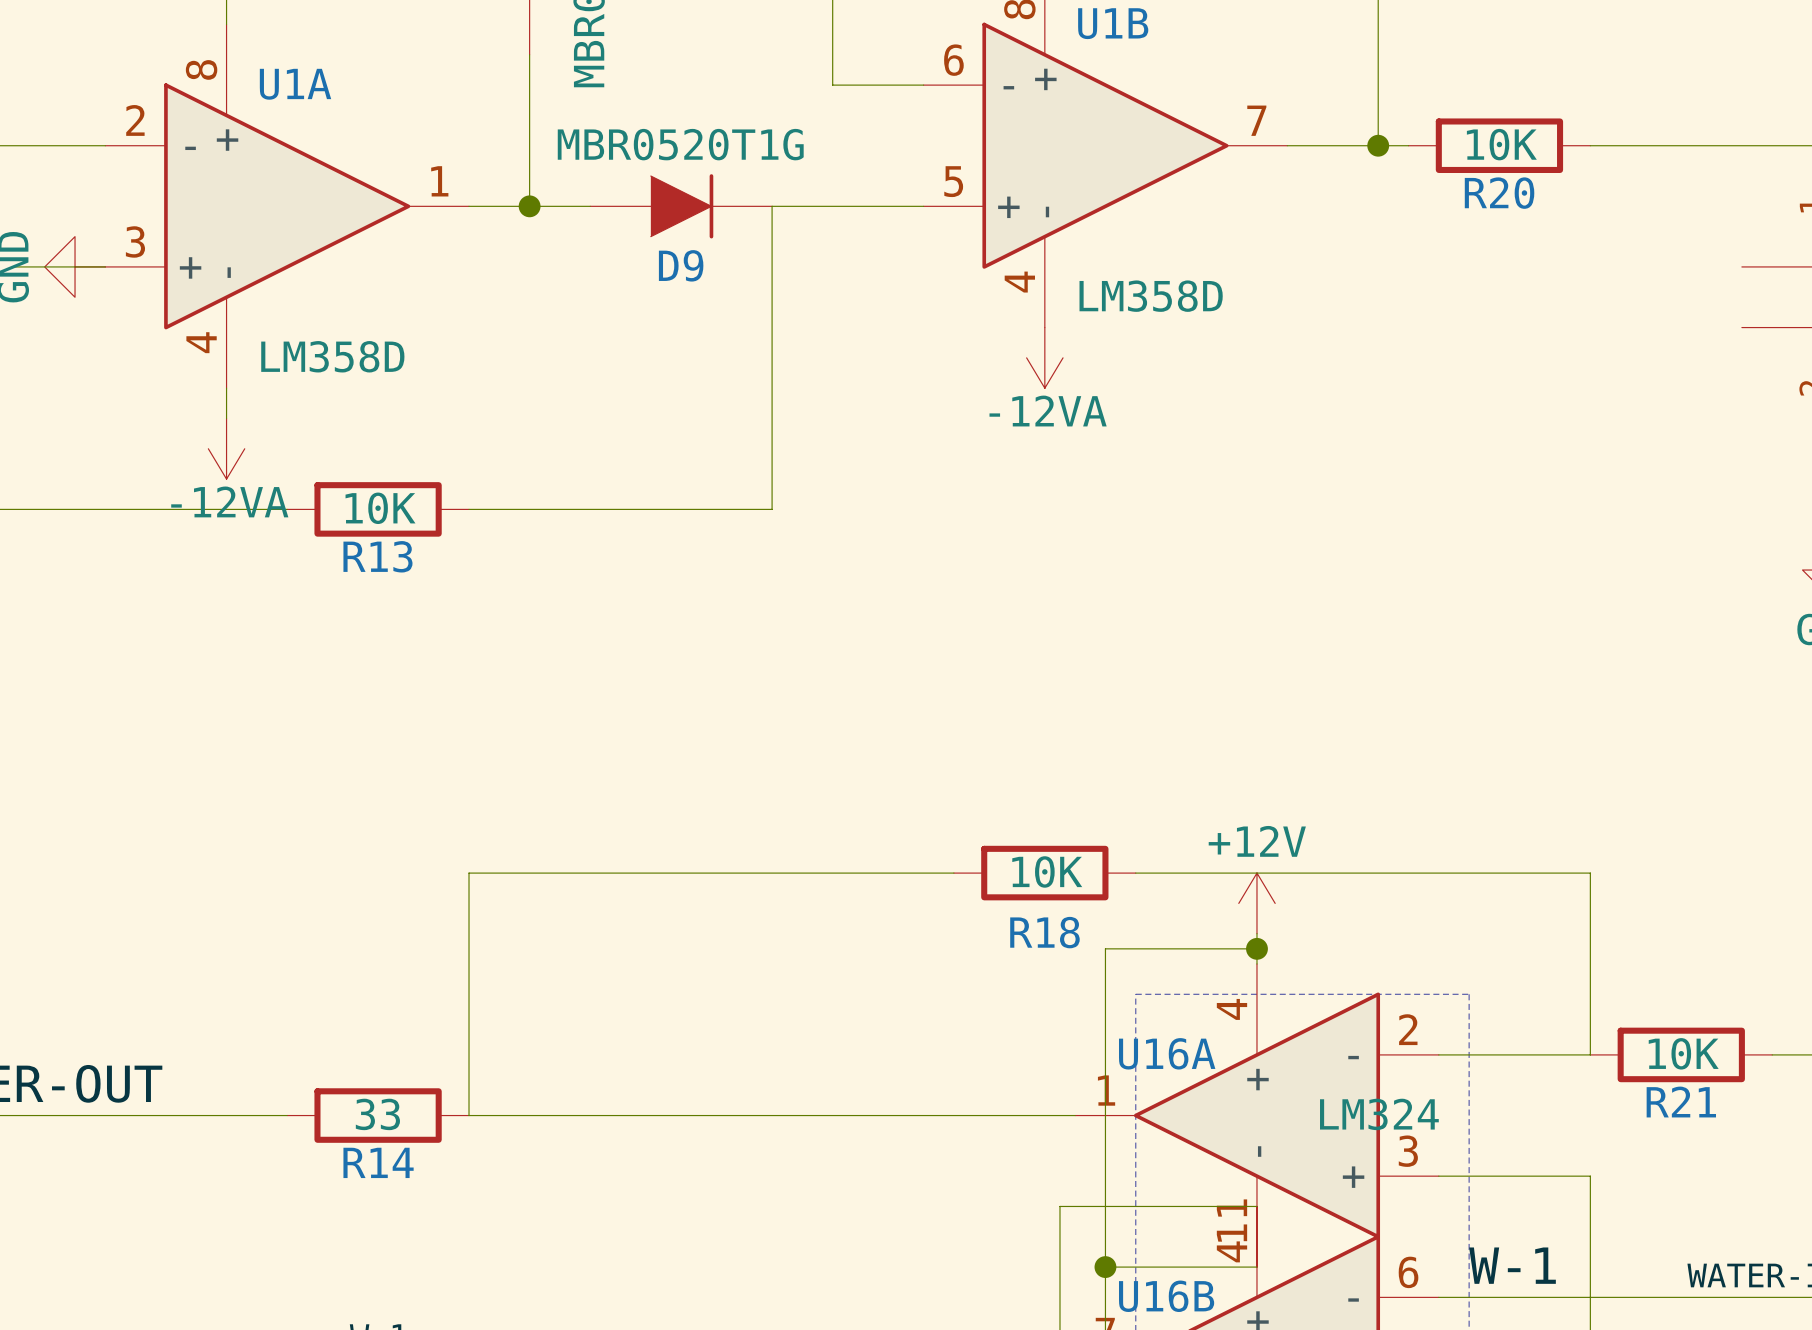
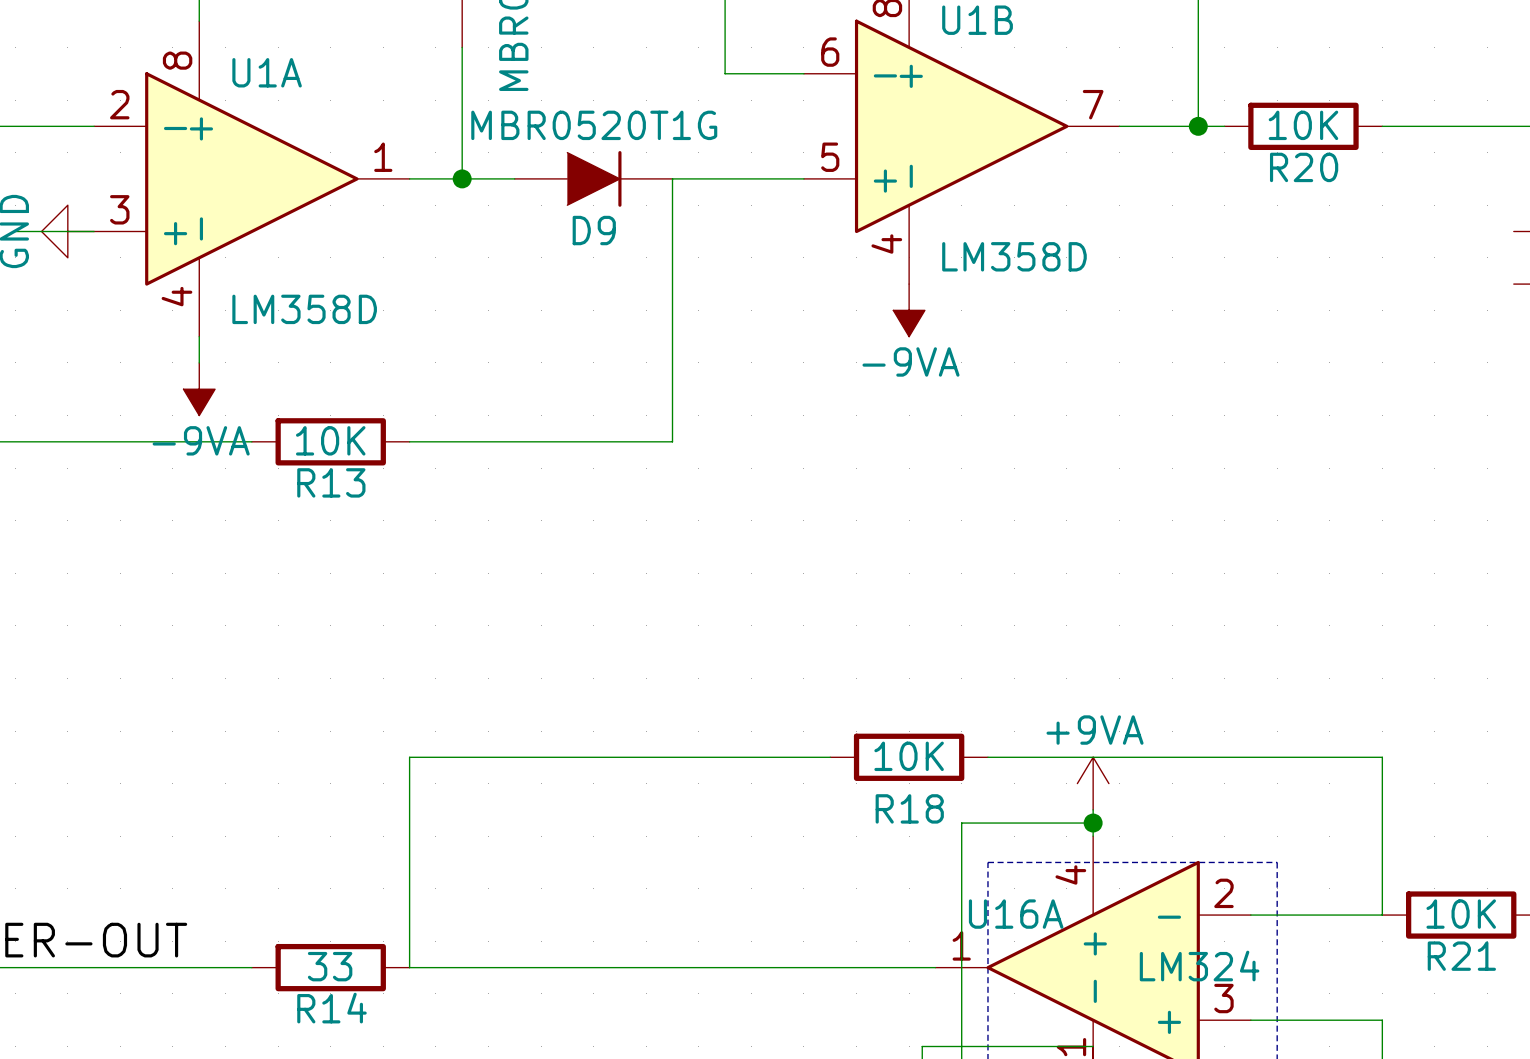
power symbol: -12VA (1044, 357) -> -9VA (909, 310)
power symbol: -12VA (226, 448) -> -9VA (199, 389)
power symbol: +12V (1256, 903) -> +9VA (1093, 783)

